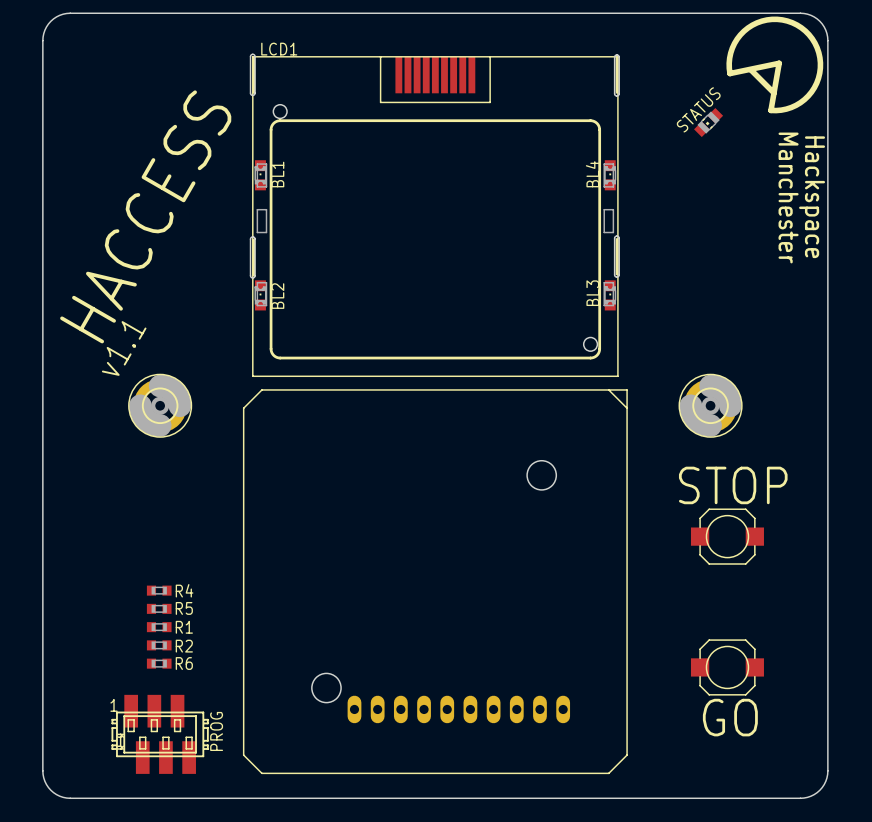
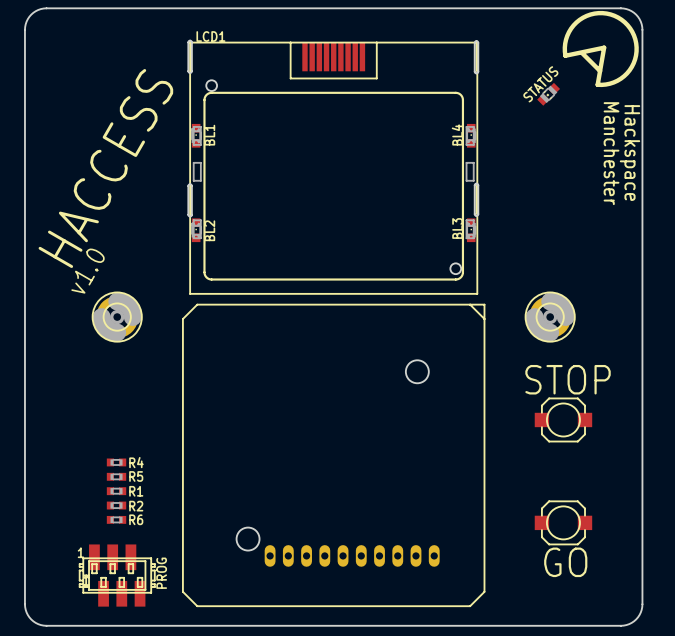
text: v1.1 (124, 348) -> v1.0 (88, 271)

